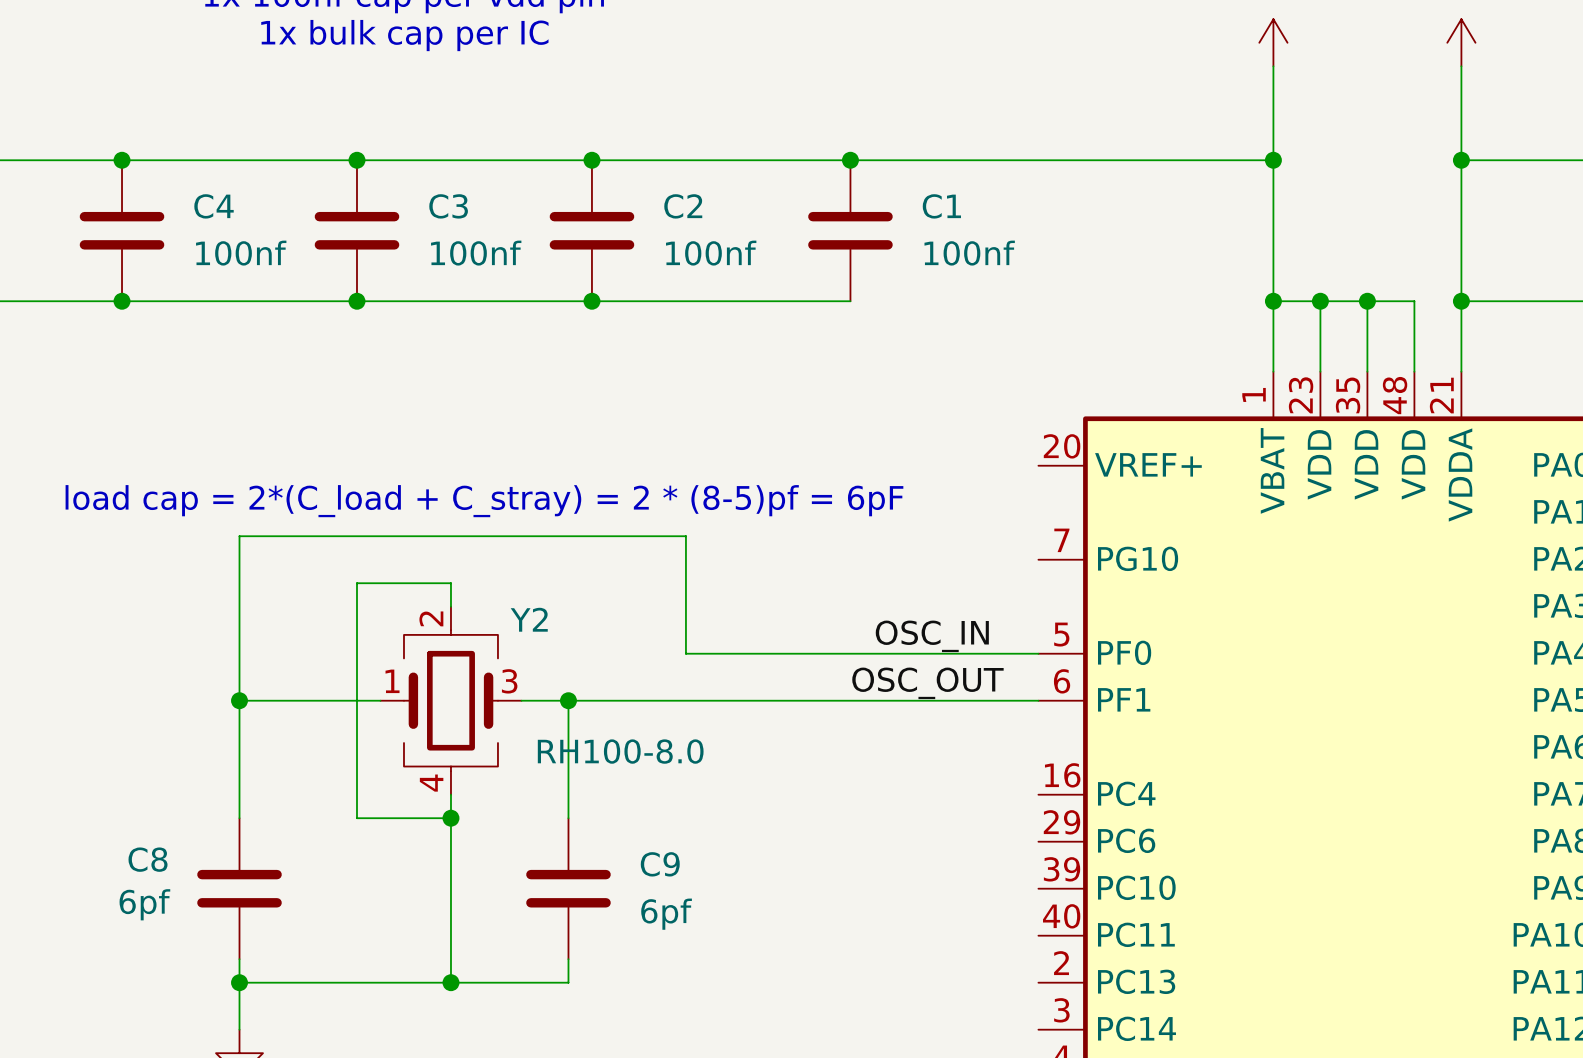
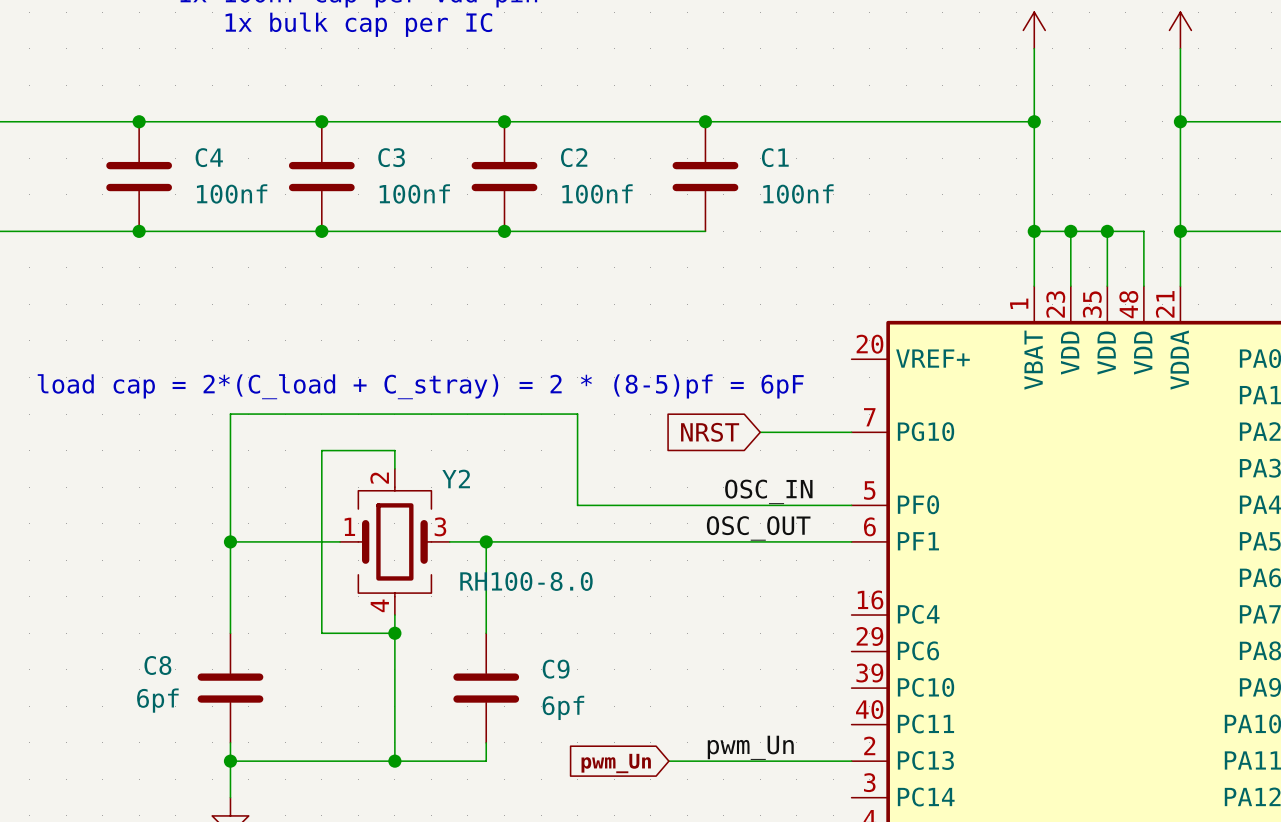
global label: none -> NRST (710, 432)
wire: none -> (760, 432) (851, 432)
label: none -> pwm_Un (750, 747)
wire: none -> (668, 761) (851, 761)
global label: none -> pwm_Un (616, 763)

